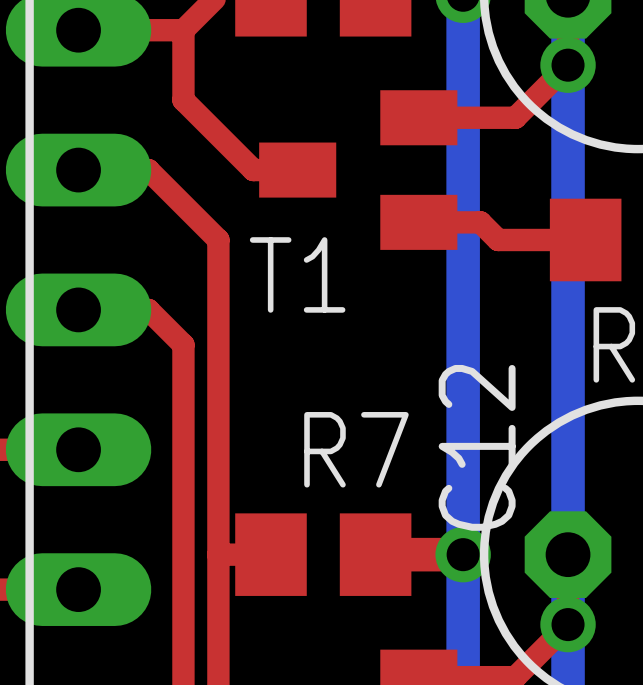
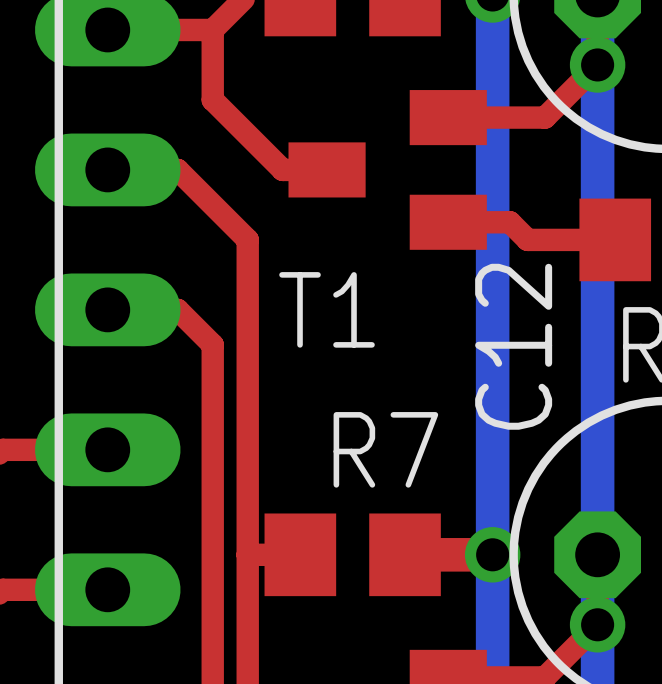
T1 name position: T1 (297, 274) -> T1 (327, 309)
C12 name position: C12 (477, 447) -> C12 (513, 346)

